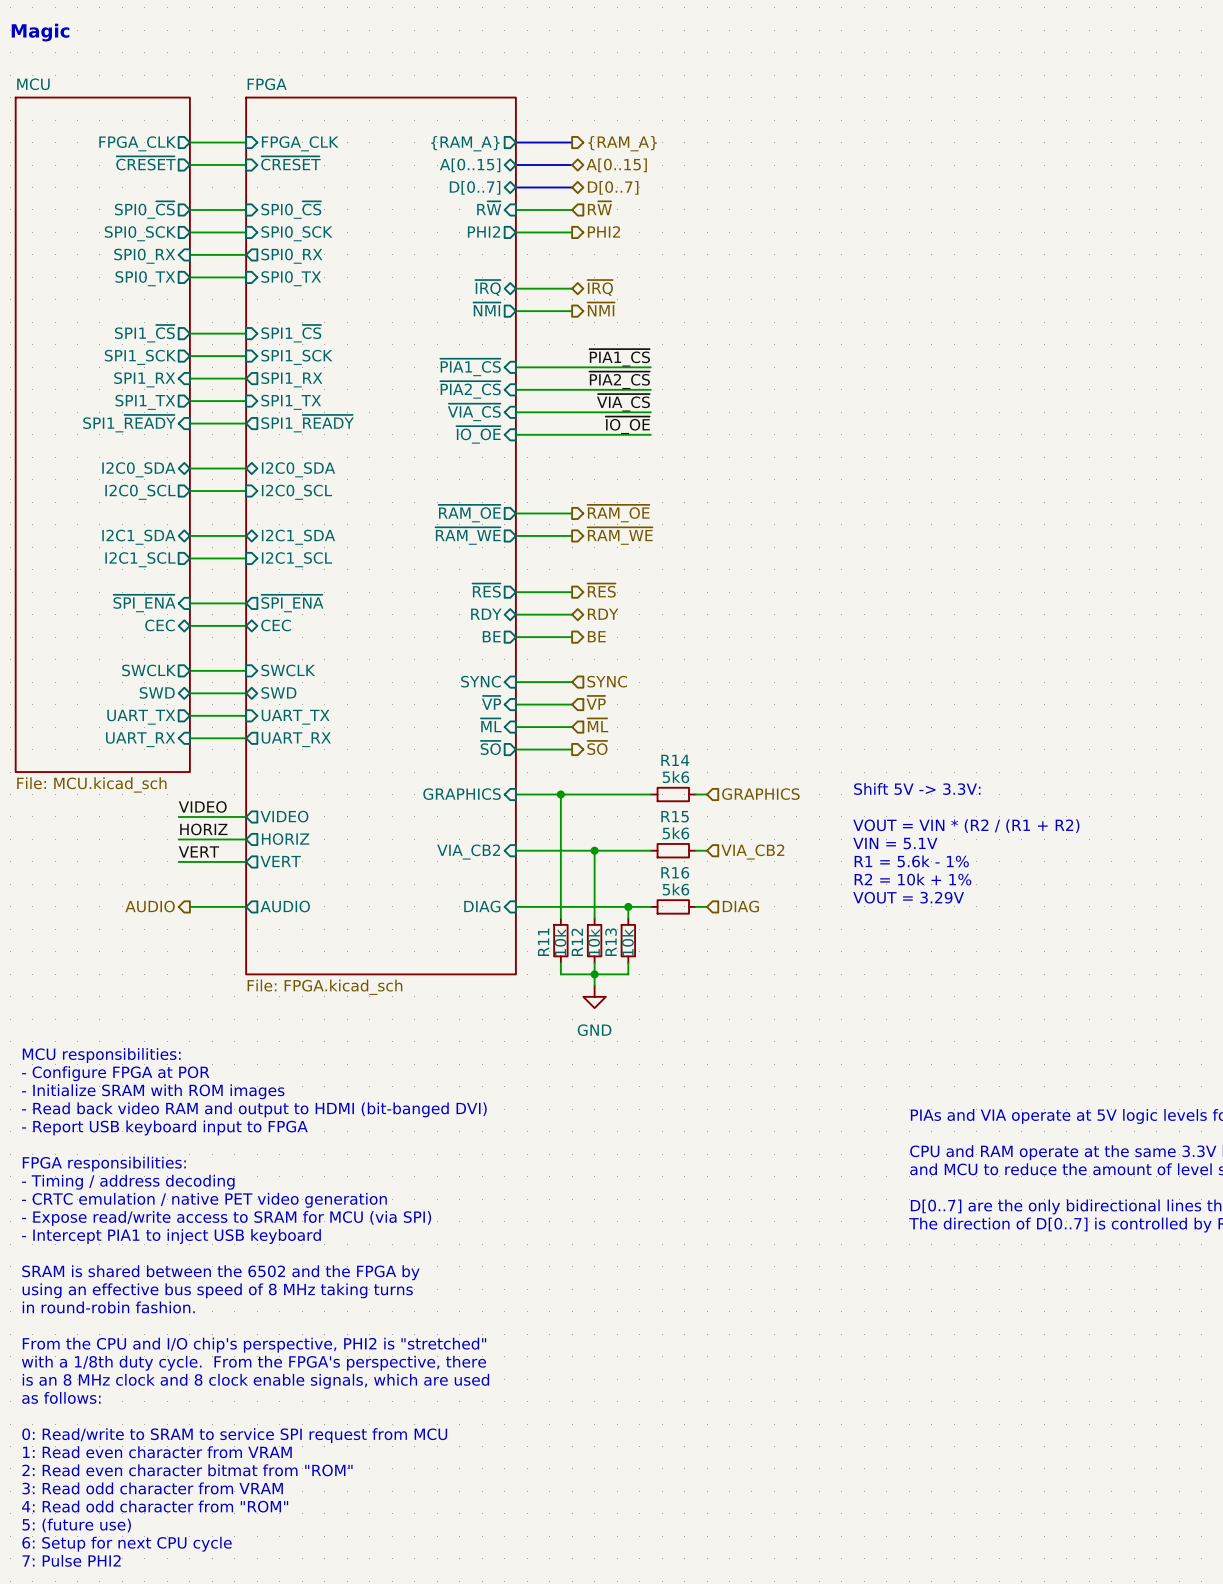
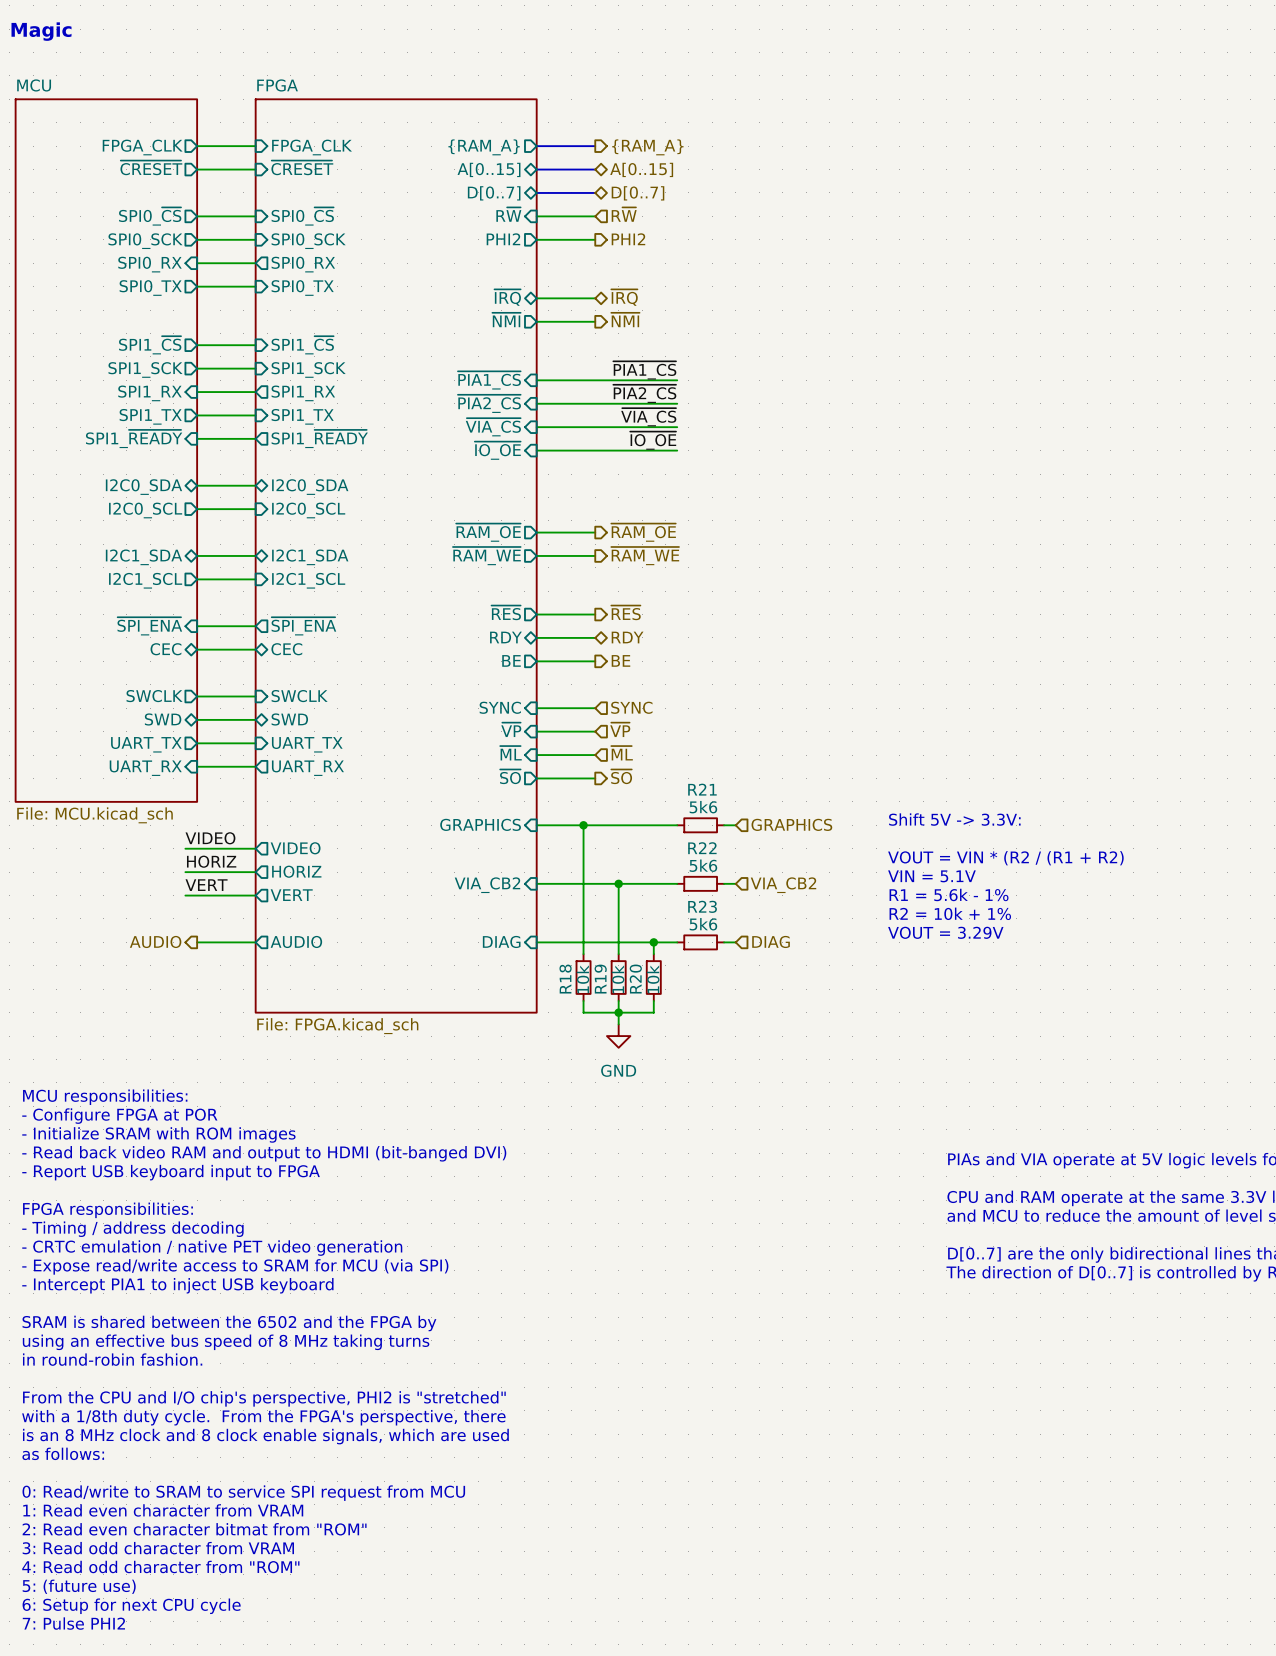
R14 name: R14 (675, 760) -> R21 (702, 789)
R15 name: R15 (675, 816) -> R22 (702, 848)
R16 name: R16 (675, 872) -> R23 (702, 906)
R11 name: R11 (543, 942) -> R18 (565, 979)
R12 name: R12 (577, 942) -> R19 (600, 979)
R13 name: R13 (611, 942) -> R20 (635, 979)

